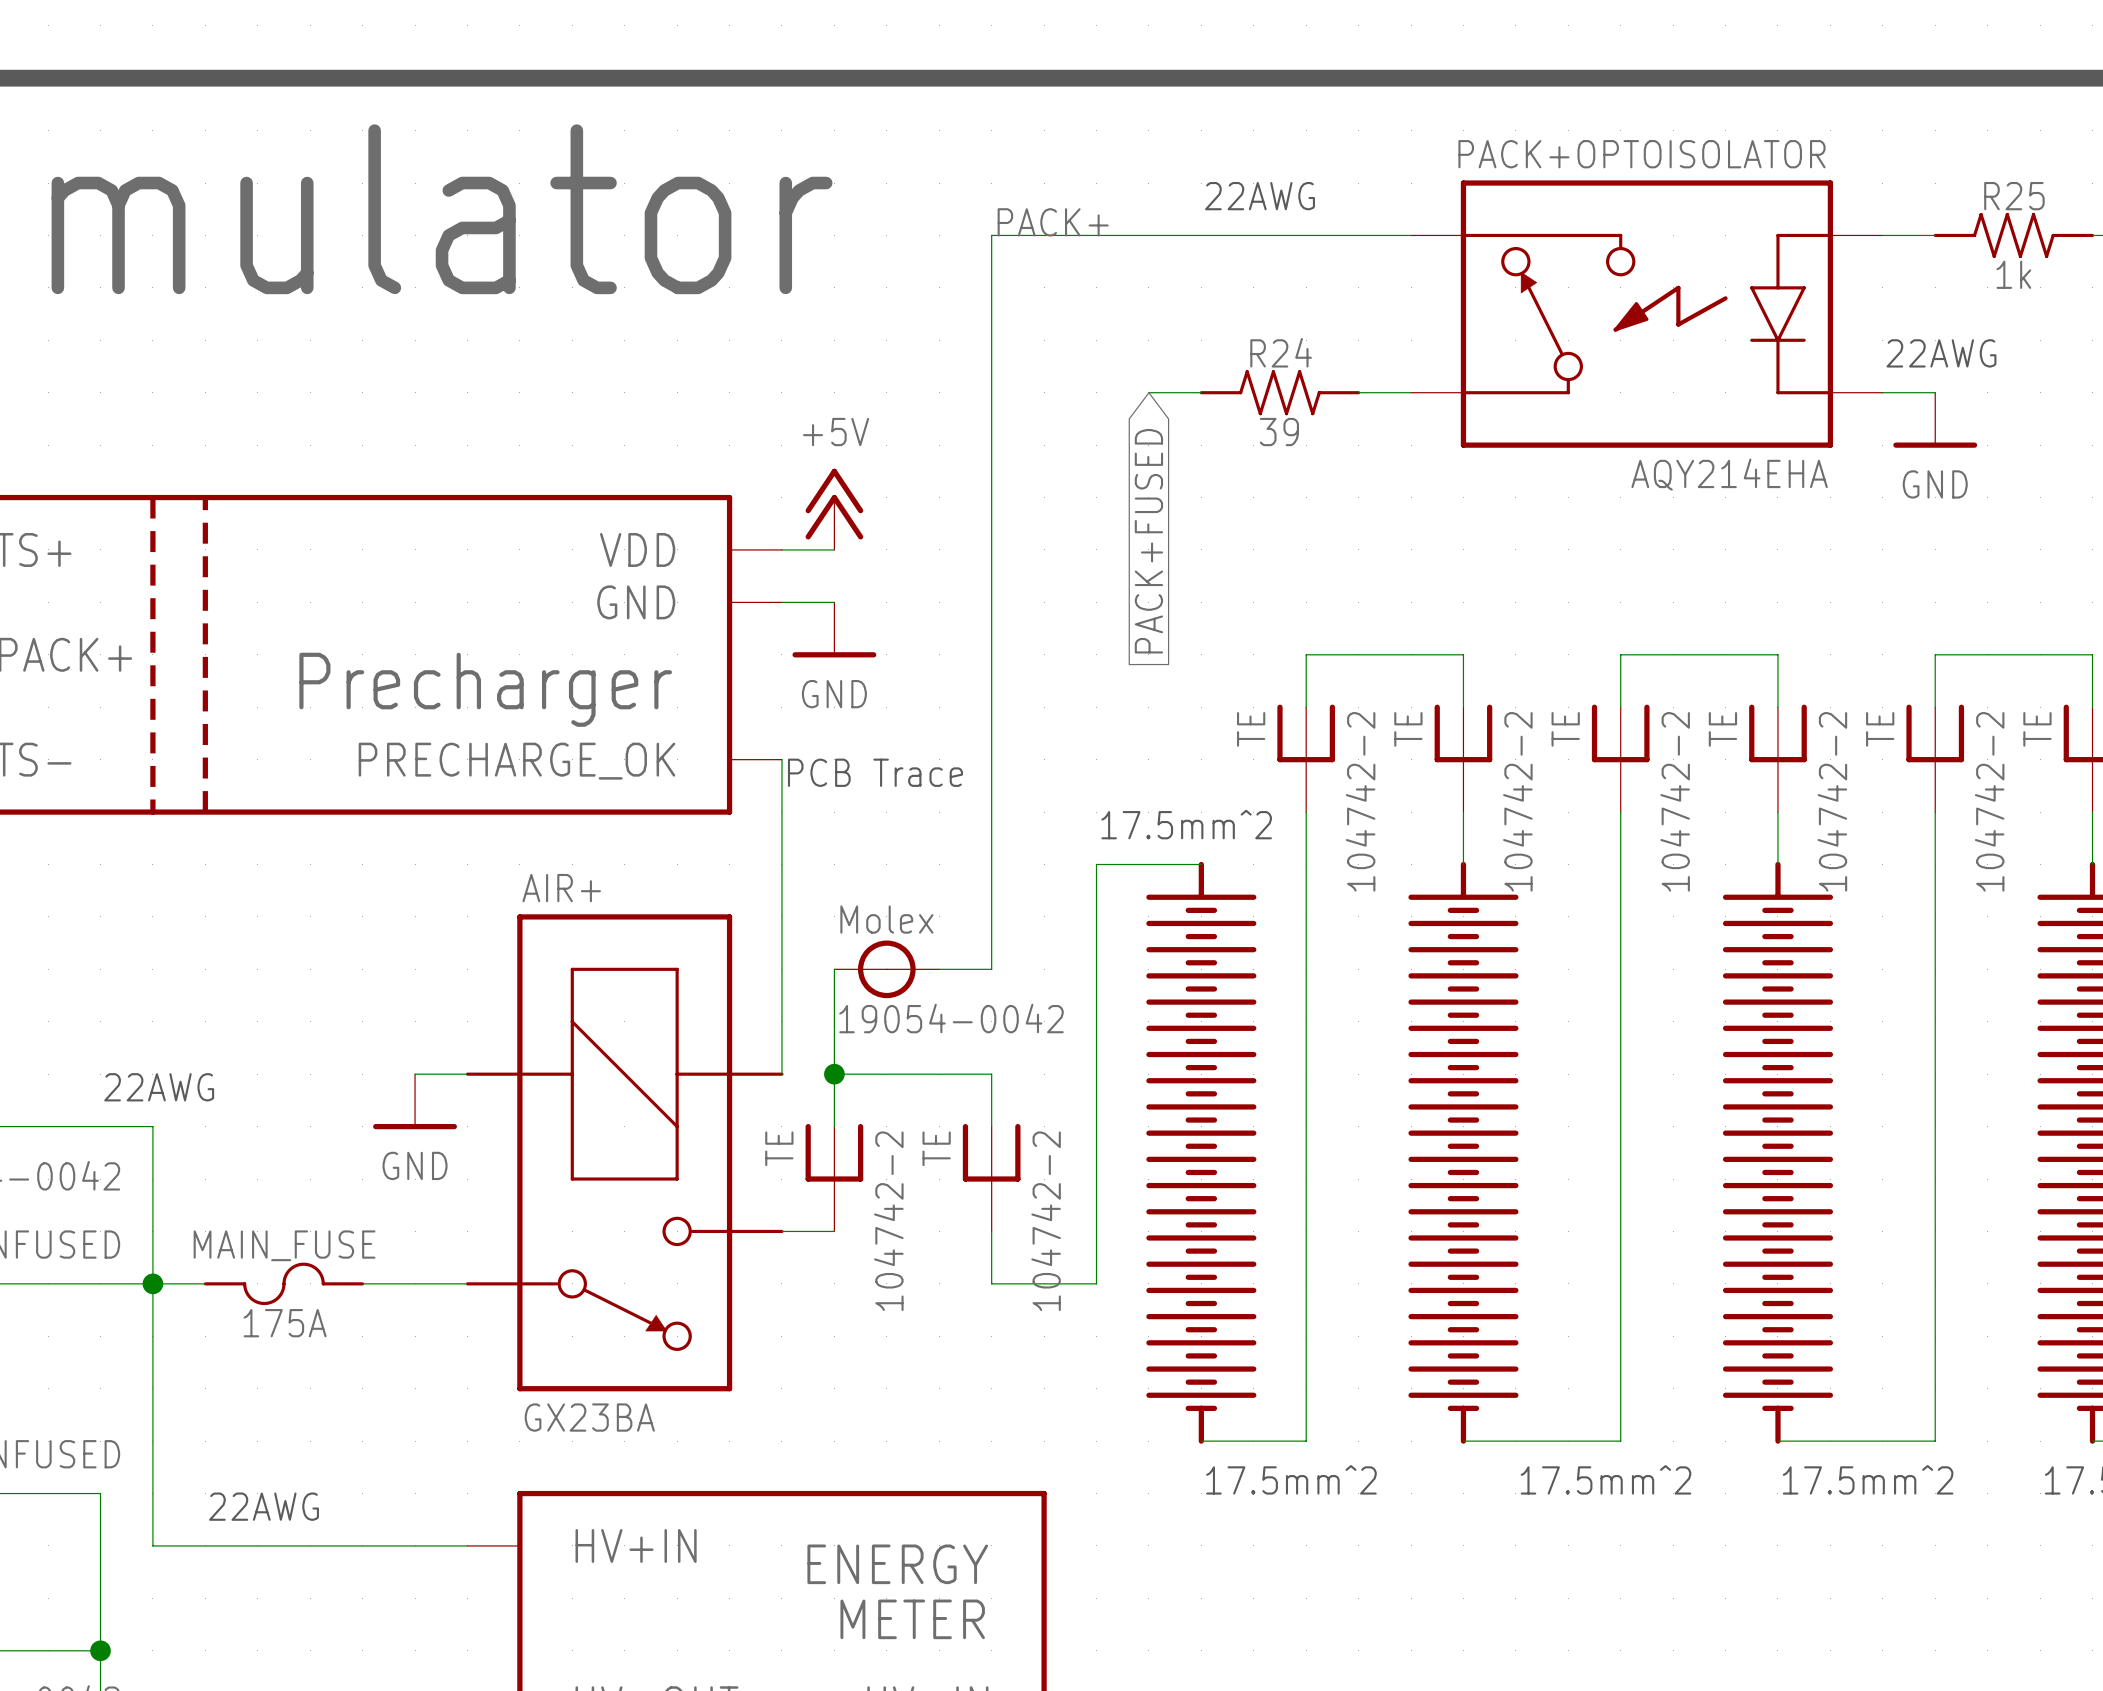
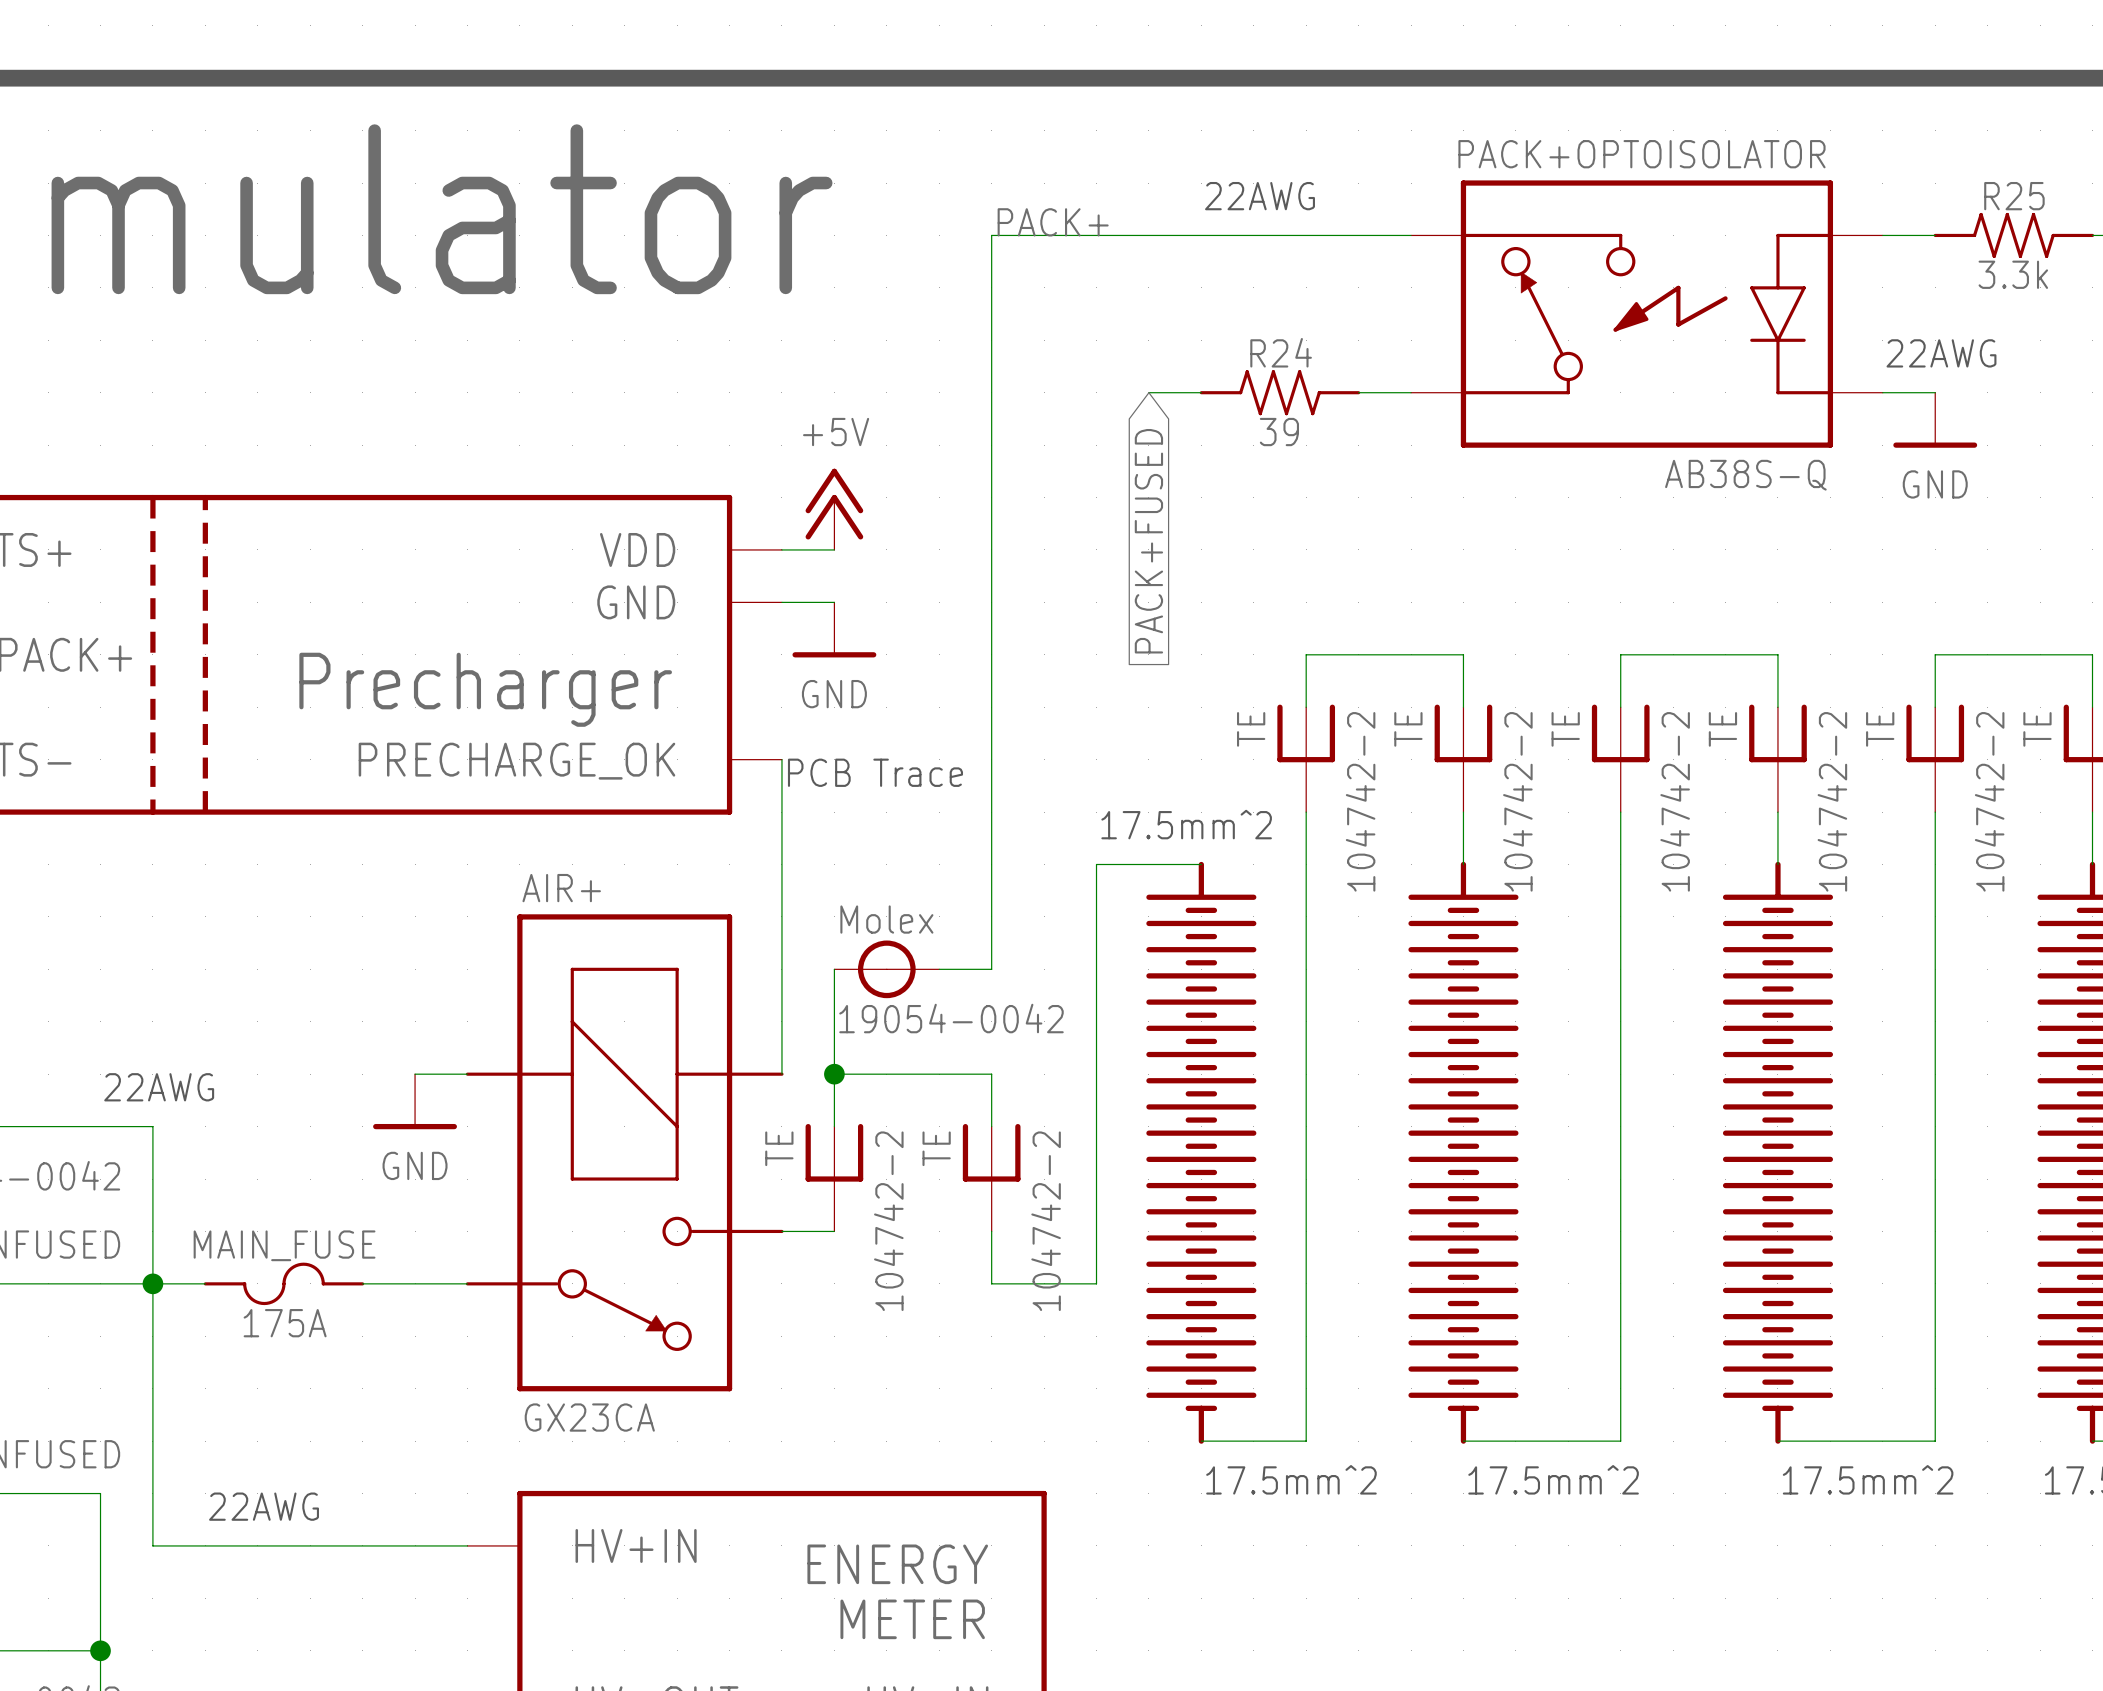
R25 value: 1k (2013, 274) -> 3.3k (2013, 274)
PACK+OPTOISOLATOR text: AQY214EHA (1729, 474) -> AB38S-Q (1745, 475)
AIR+ text: GX23BA (589, 1417) -> GX23CA (589, 1417)
text position: 17.5mm^2 (1605, 1479) -> 17.5mm^2 (1553, 1479)

